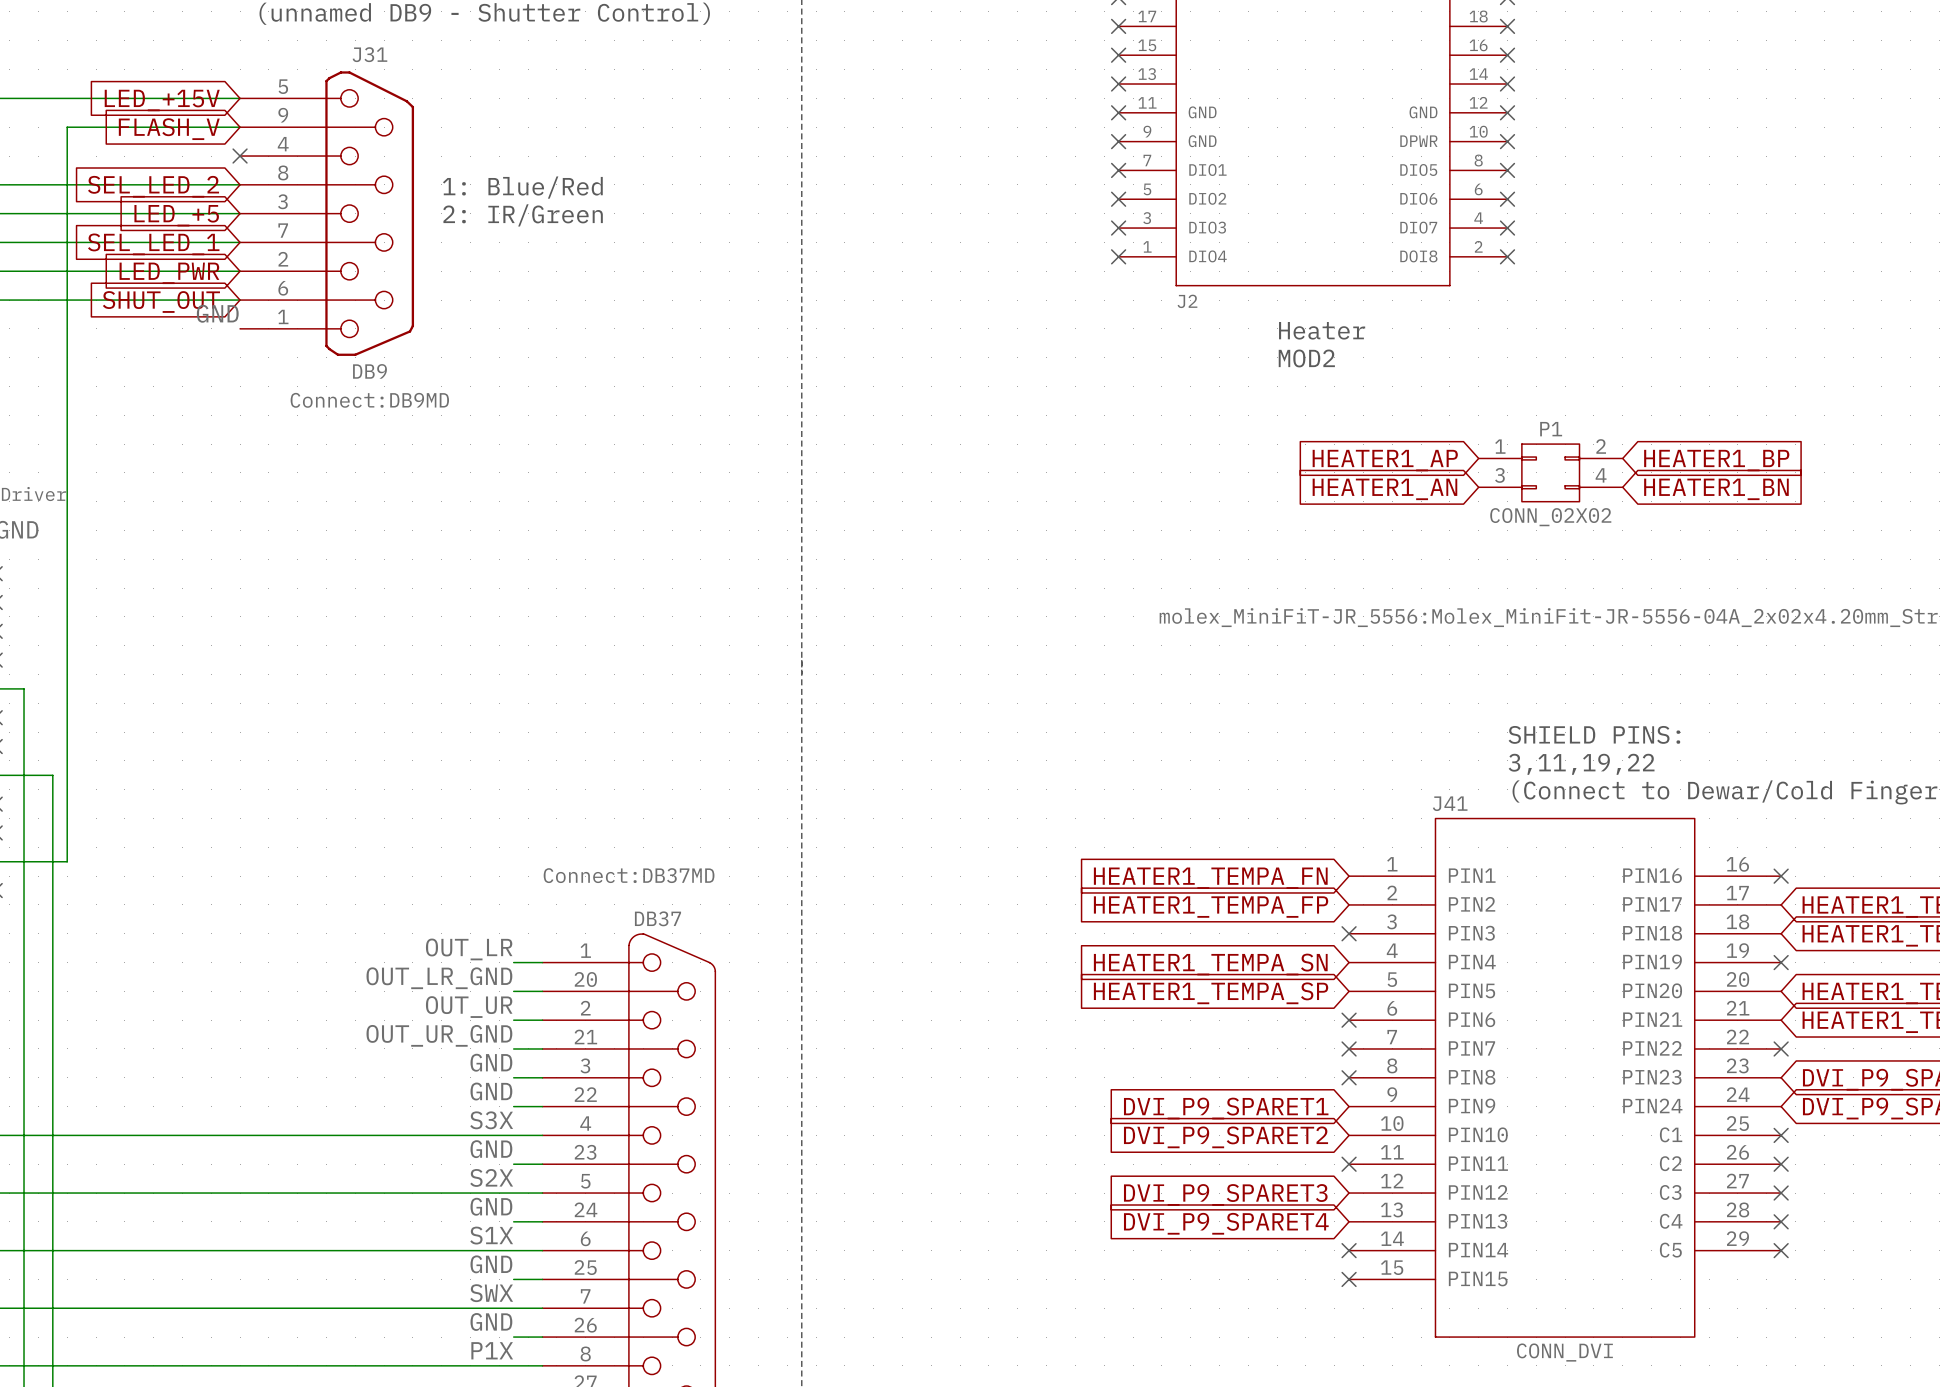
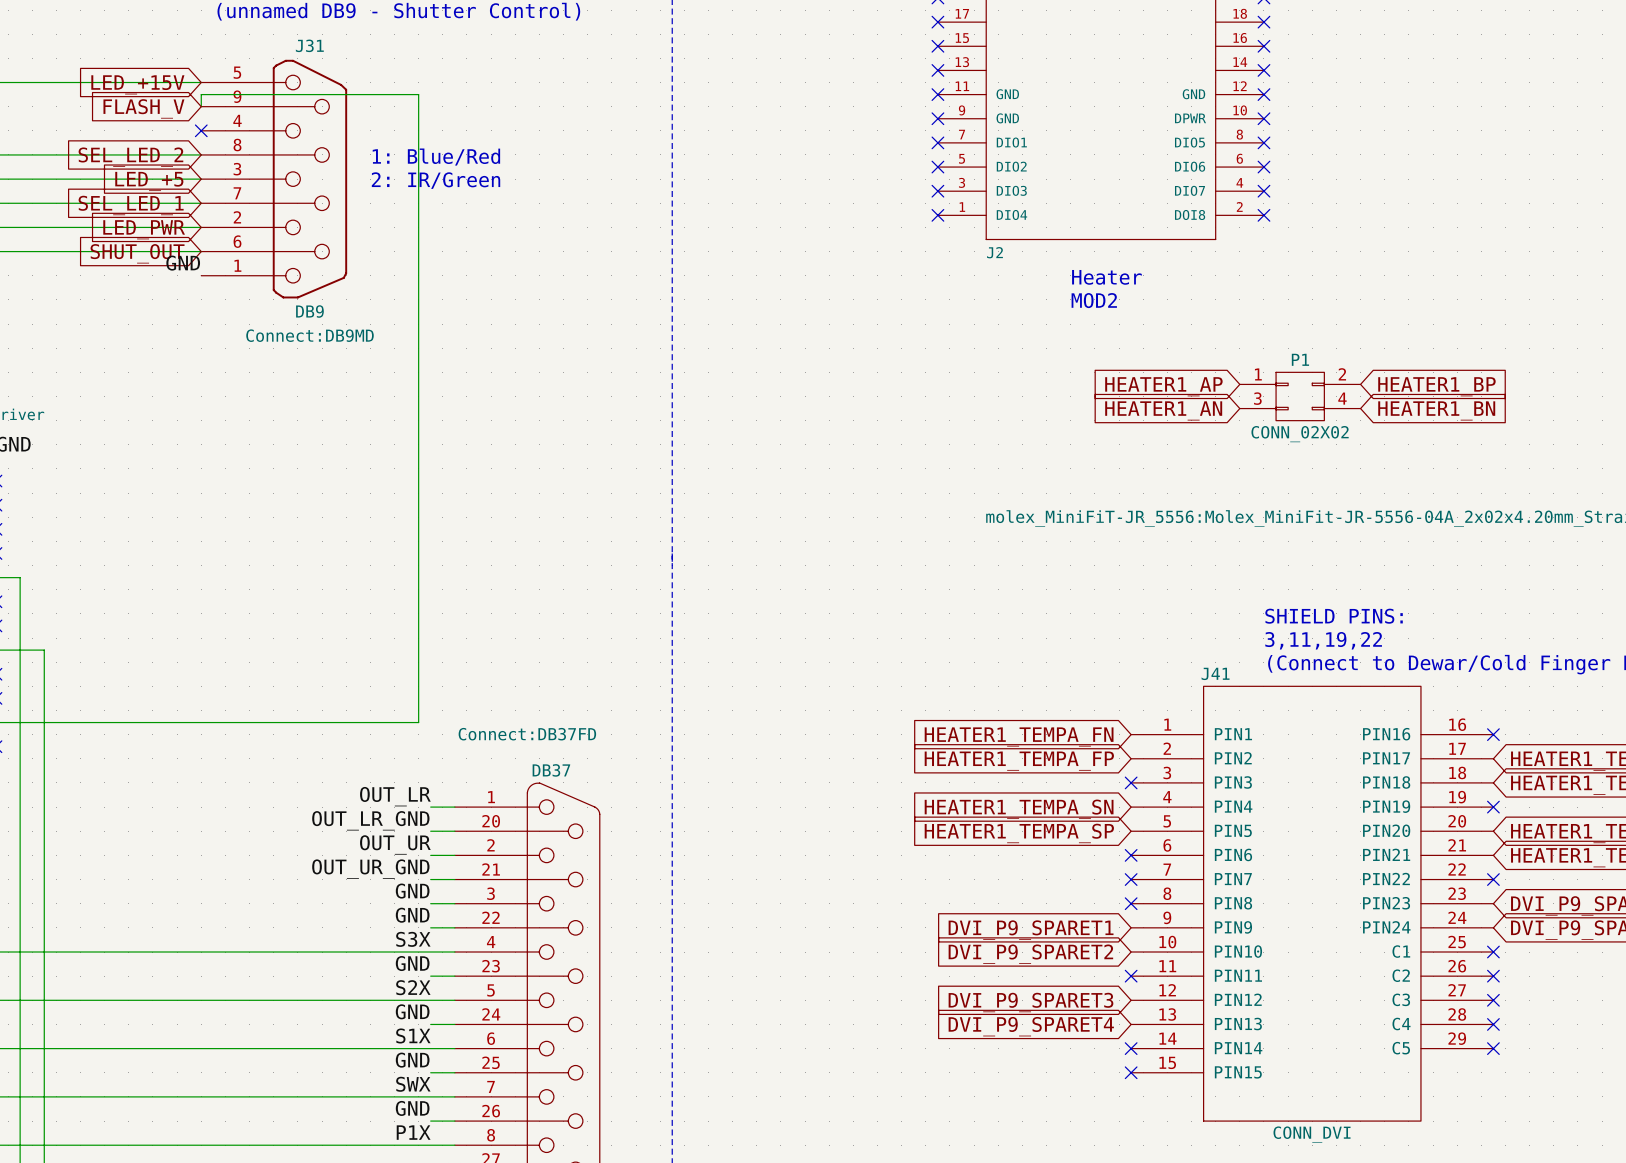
wire: (240, 127) (67, 127) (67, 861) -> (201, 106) (201, 94) (418, 94) (418, 722) (56, 722)
part text: Connect:DB37MD (629, 875) -> Connect:DB37FD (527, 734)

